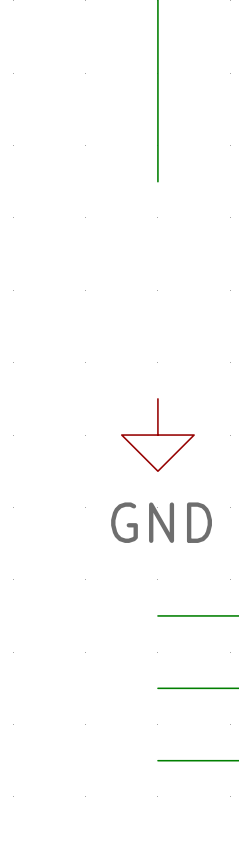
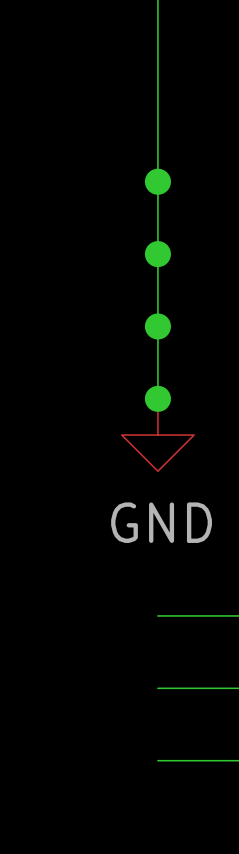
wire: none -> (157, 181) (157, 398)
junction: none -> (157, 181)
junction: none -> (157, 254)
junction: none -> (157, 326)
junction: none -> (157, 398)

